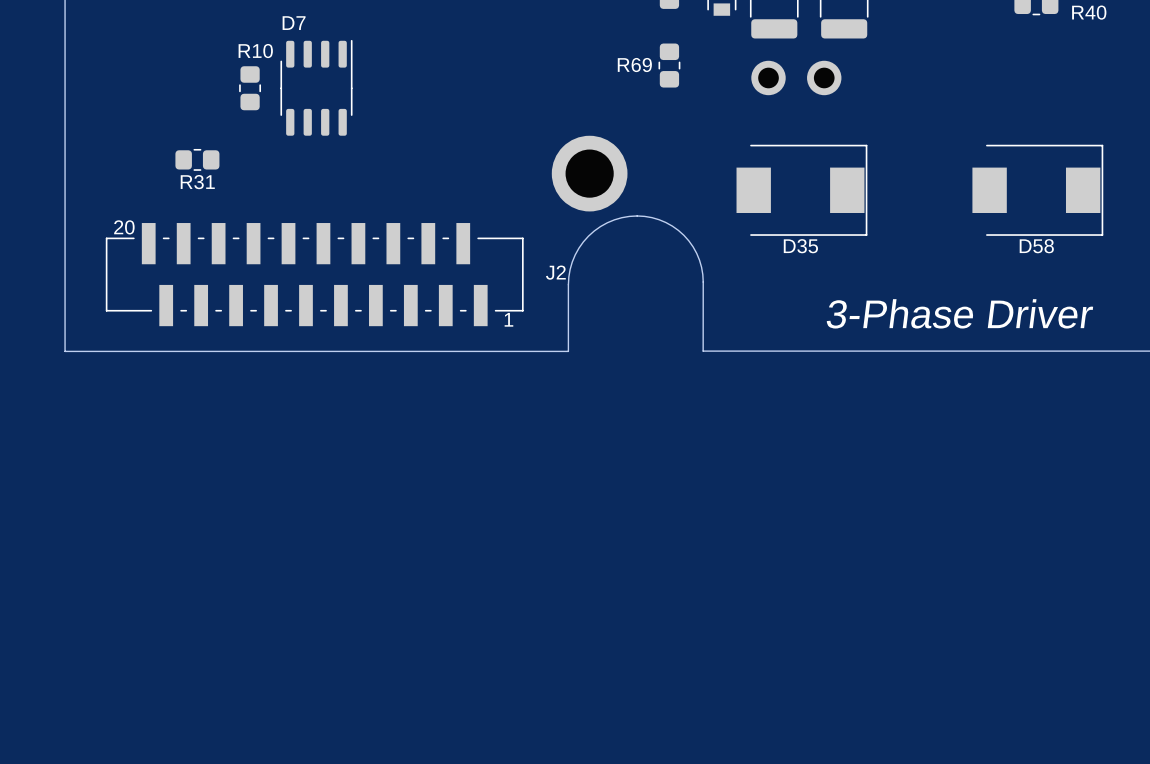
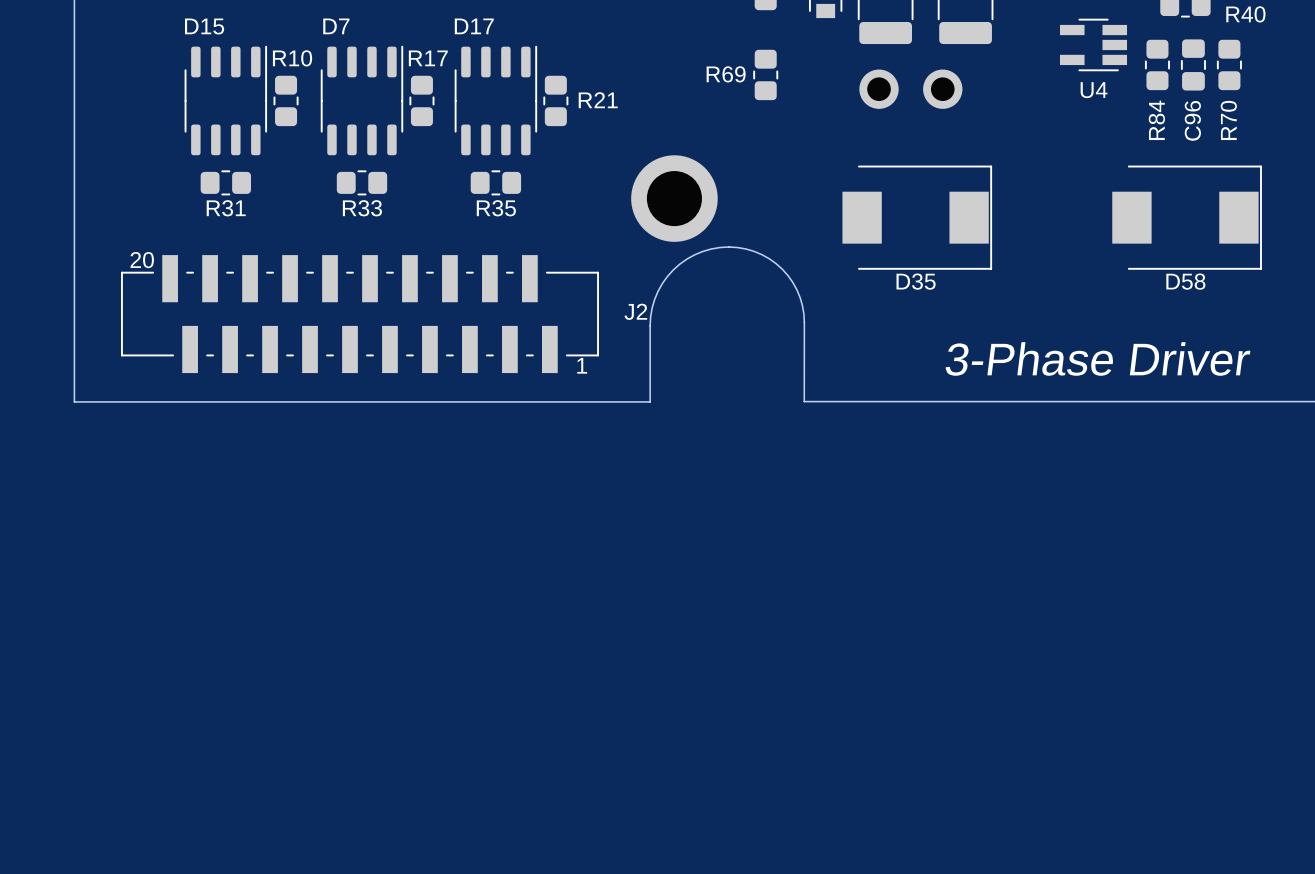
U4: none -> (1093, 44)
R84: none -> (1157, 64)
C96: none -> (1193, 64)
R70: none -> (1229, 64)
D15: none -> (225, 100)
D17: none -> (495, 100)
R17: none -> (421, 100)
R21: none -> (555, 100)
R33: none -> (361, 182)
R35: none -> (495, 182)

